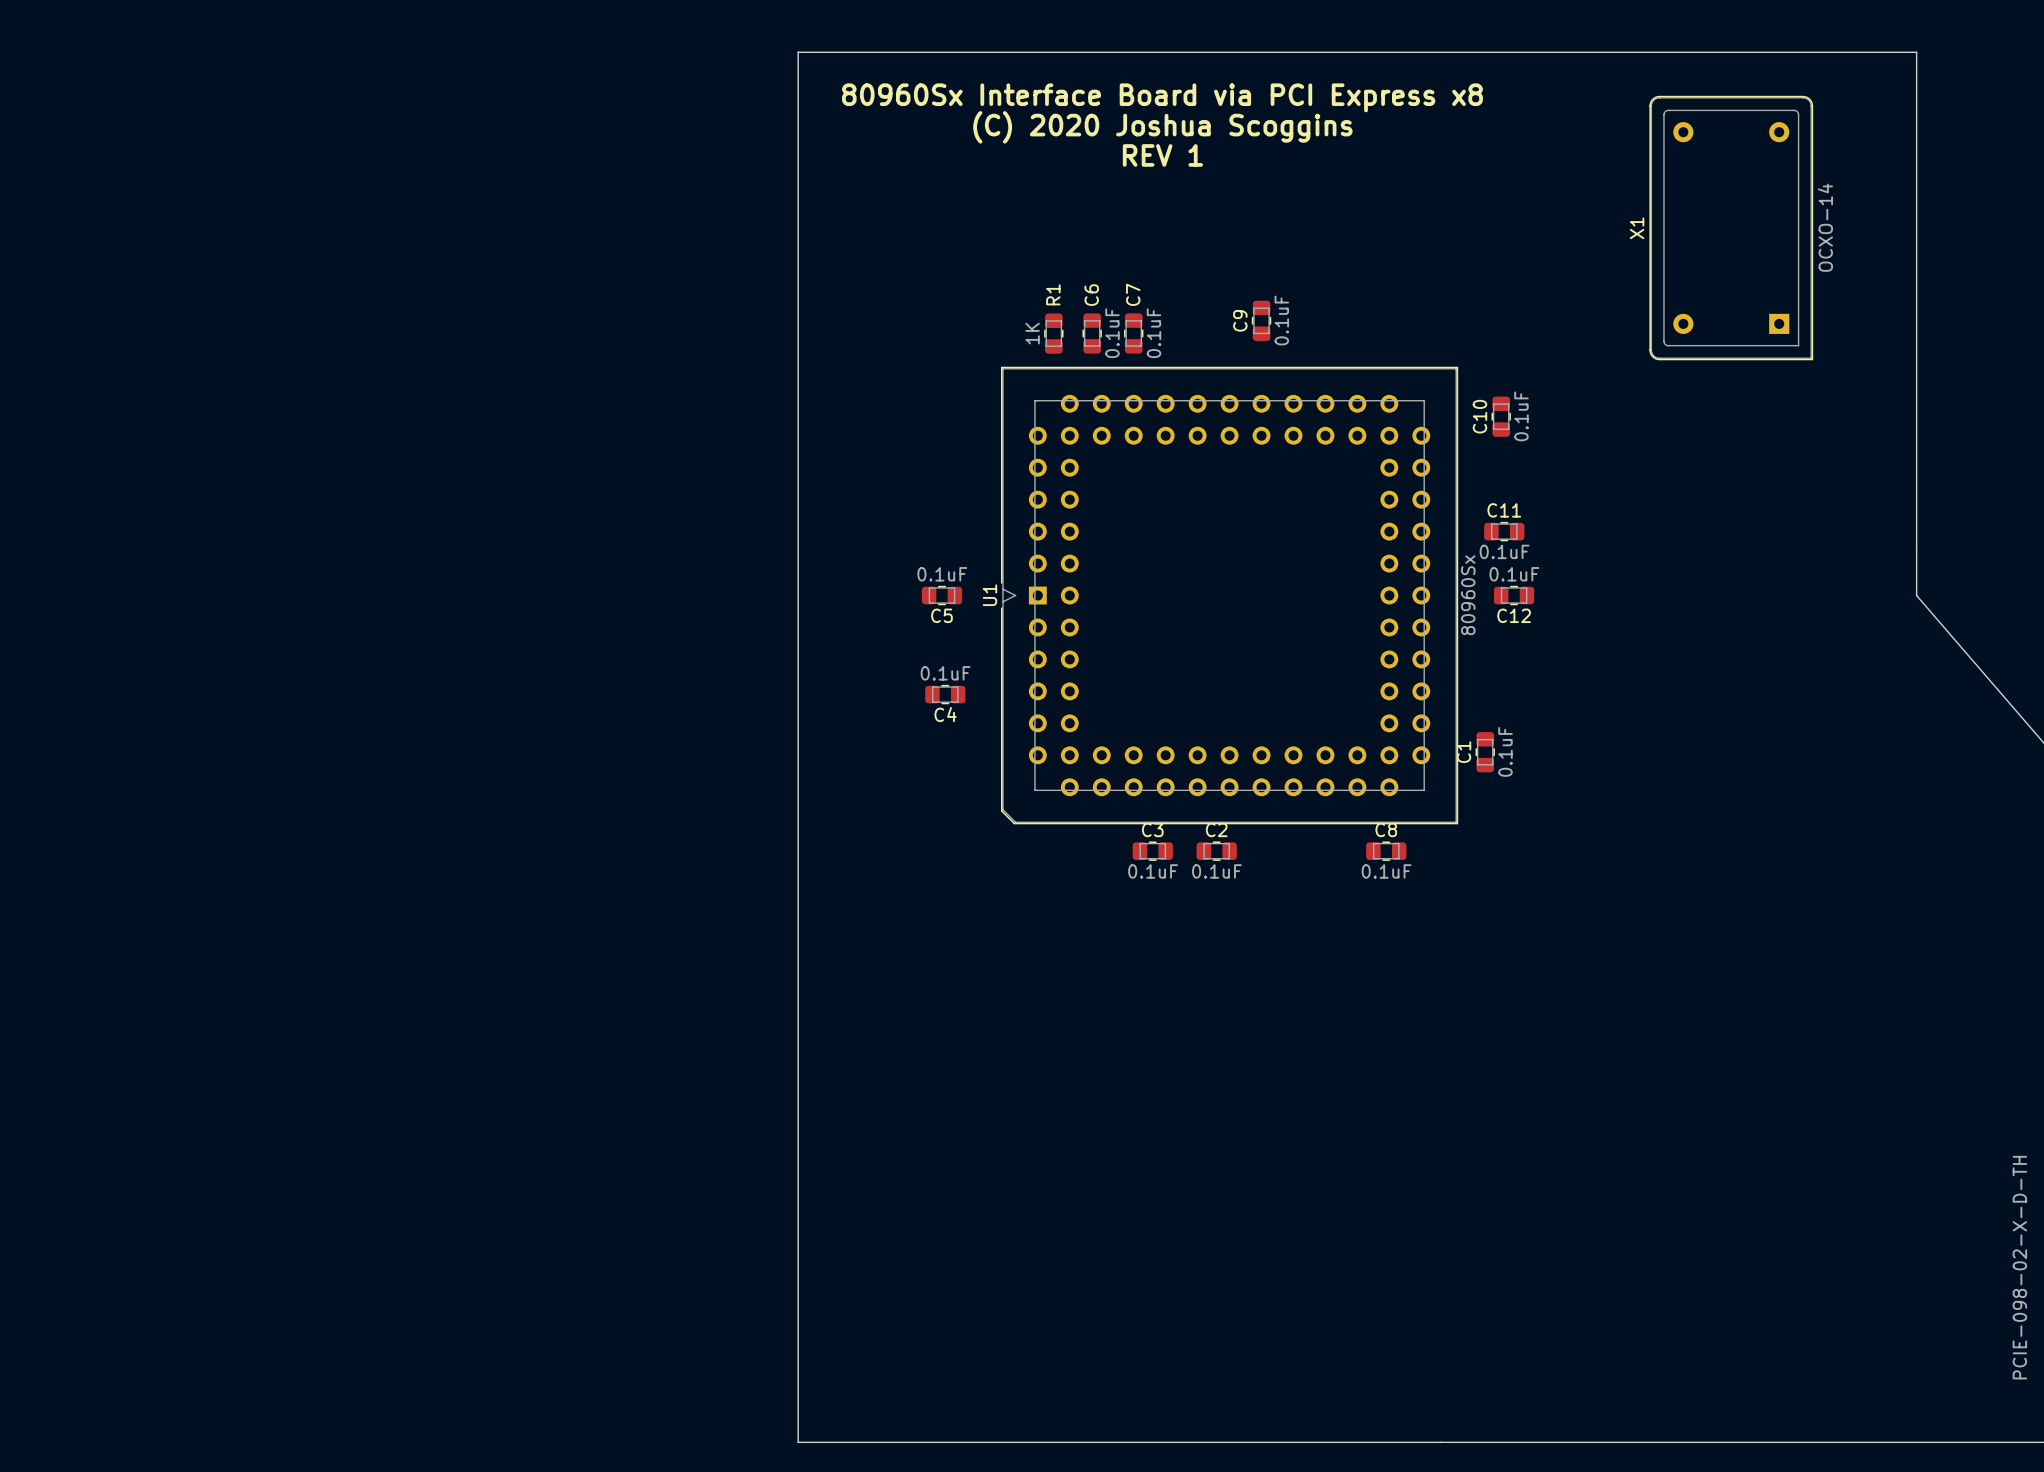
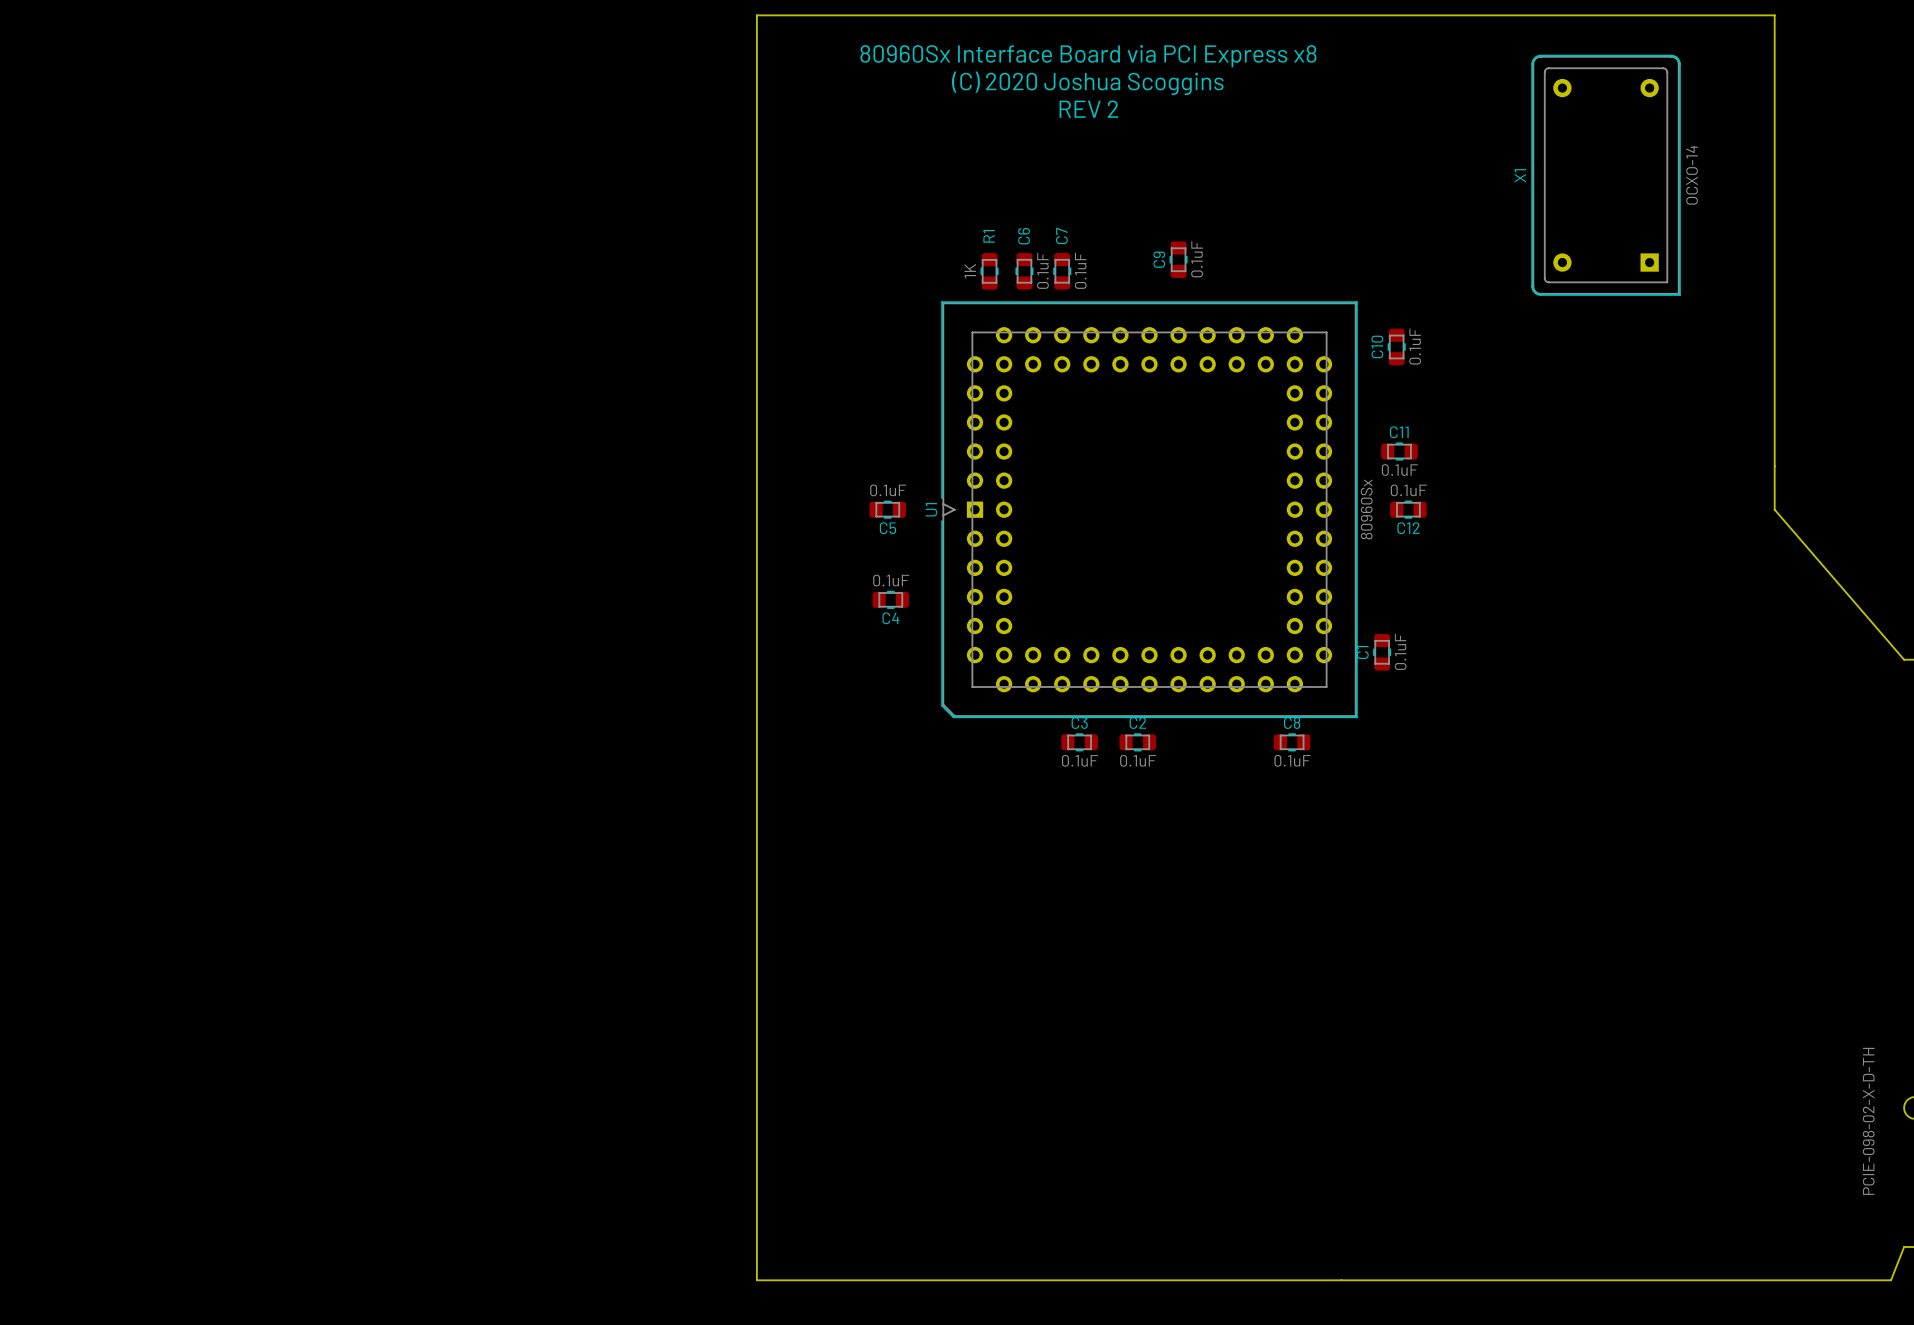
text: REV 1 (1162, 155) -> REV 2 (1088, 109)

